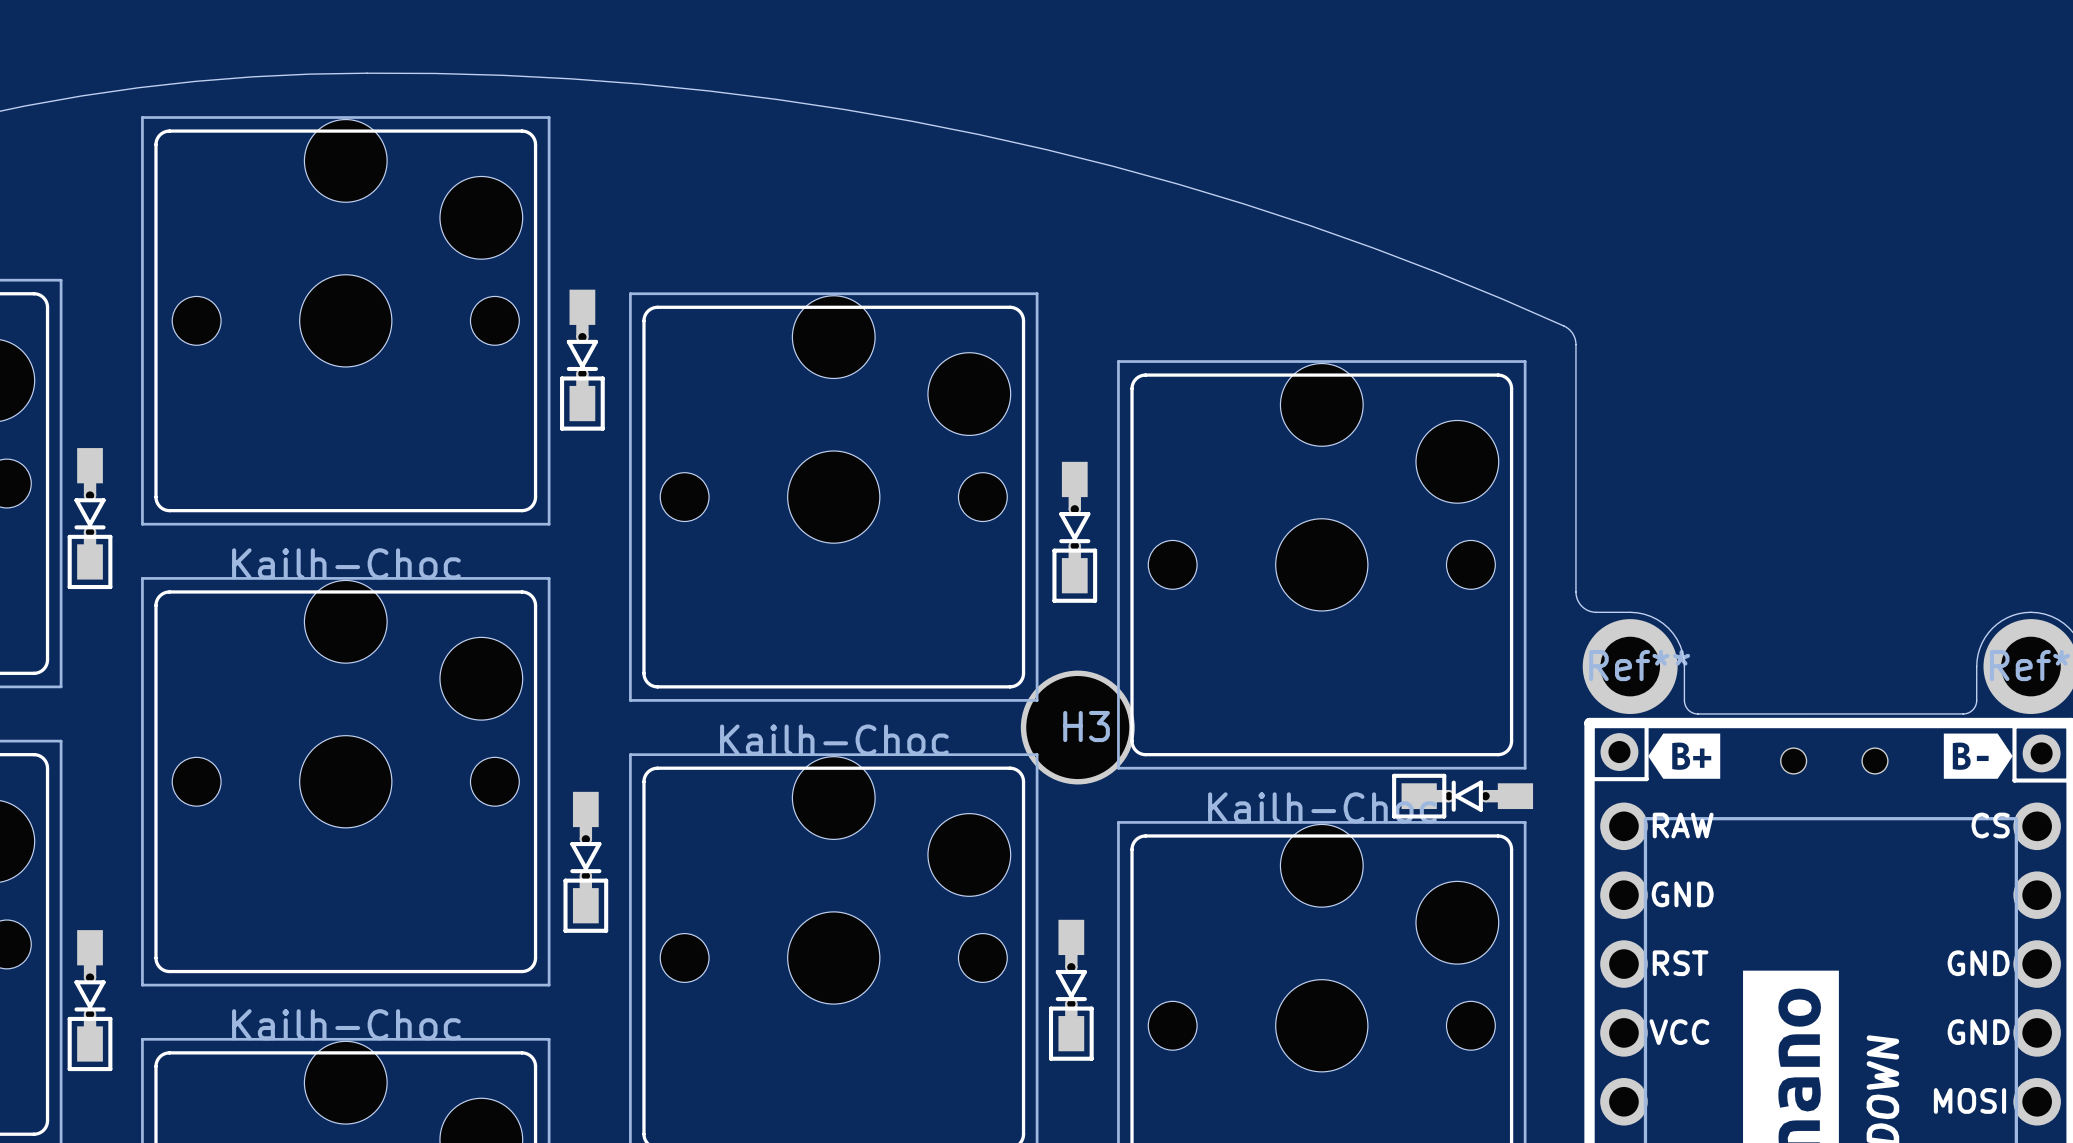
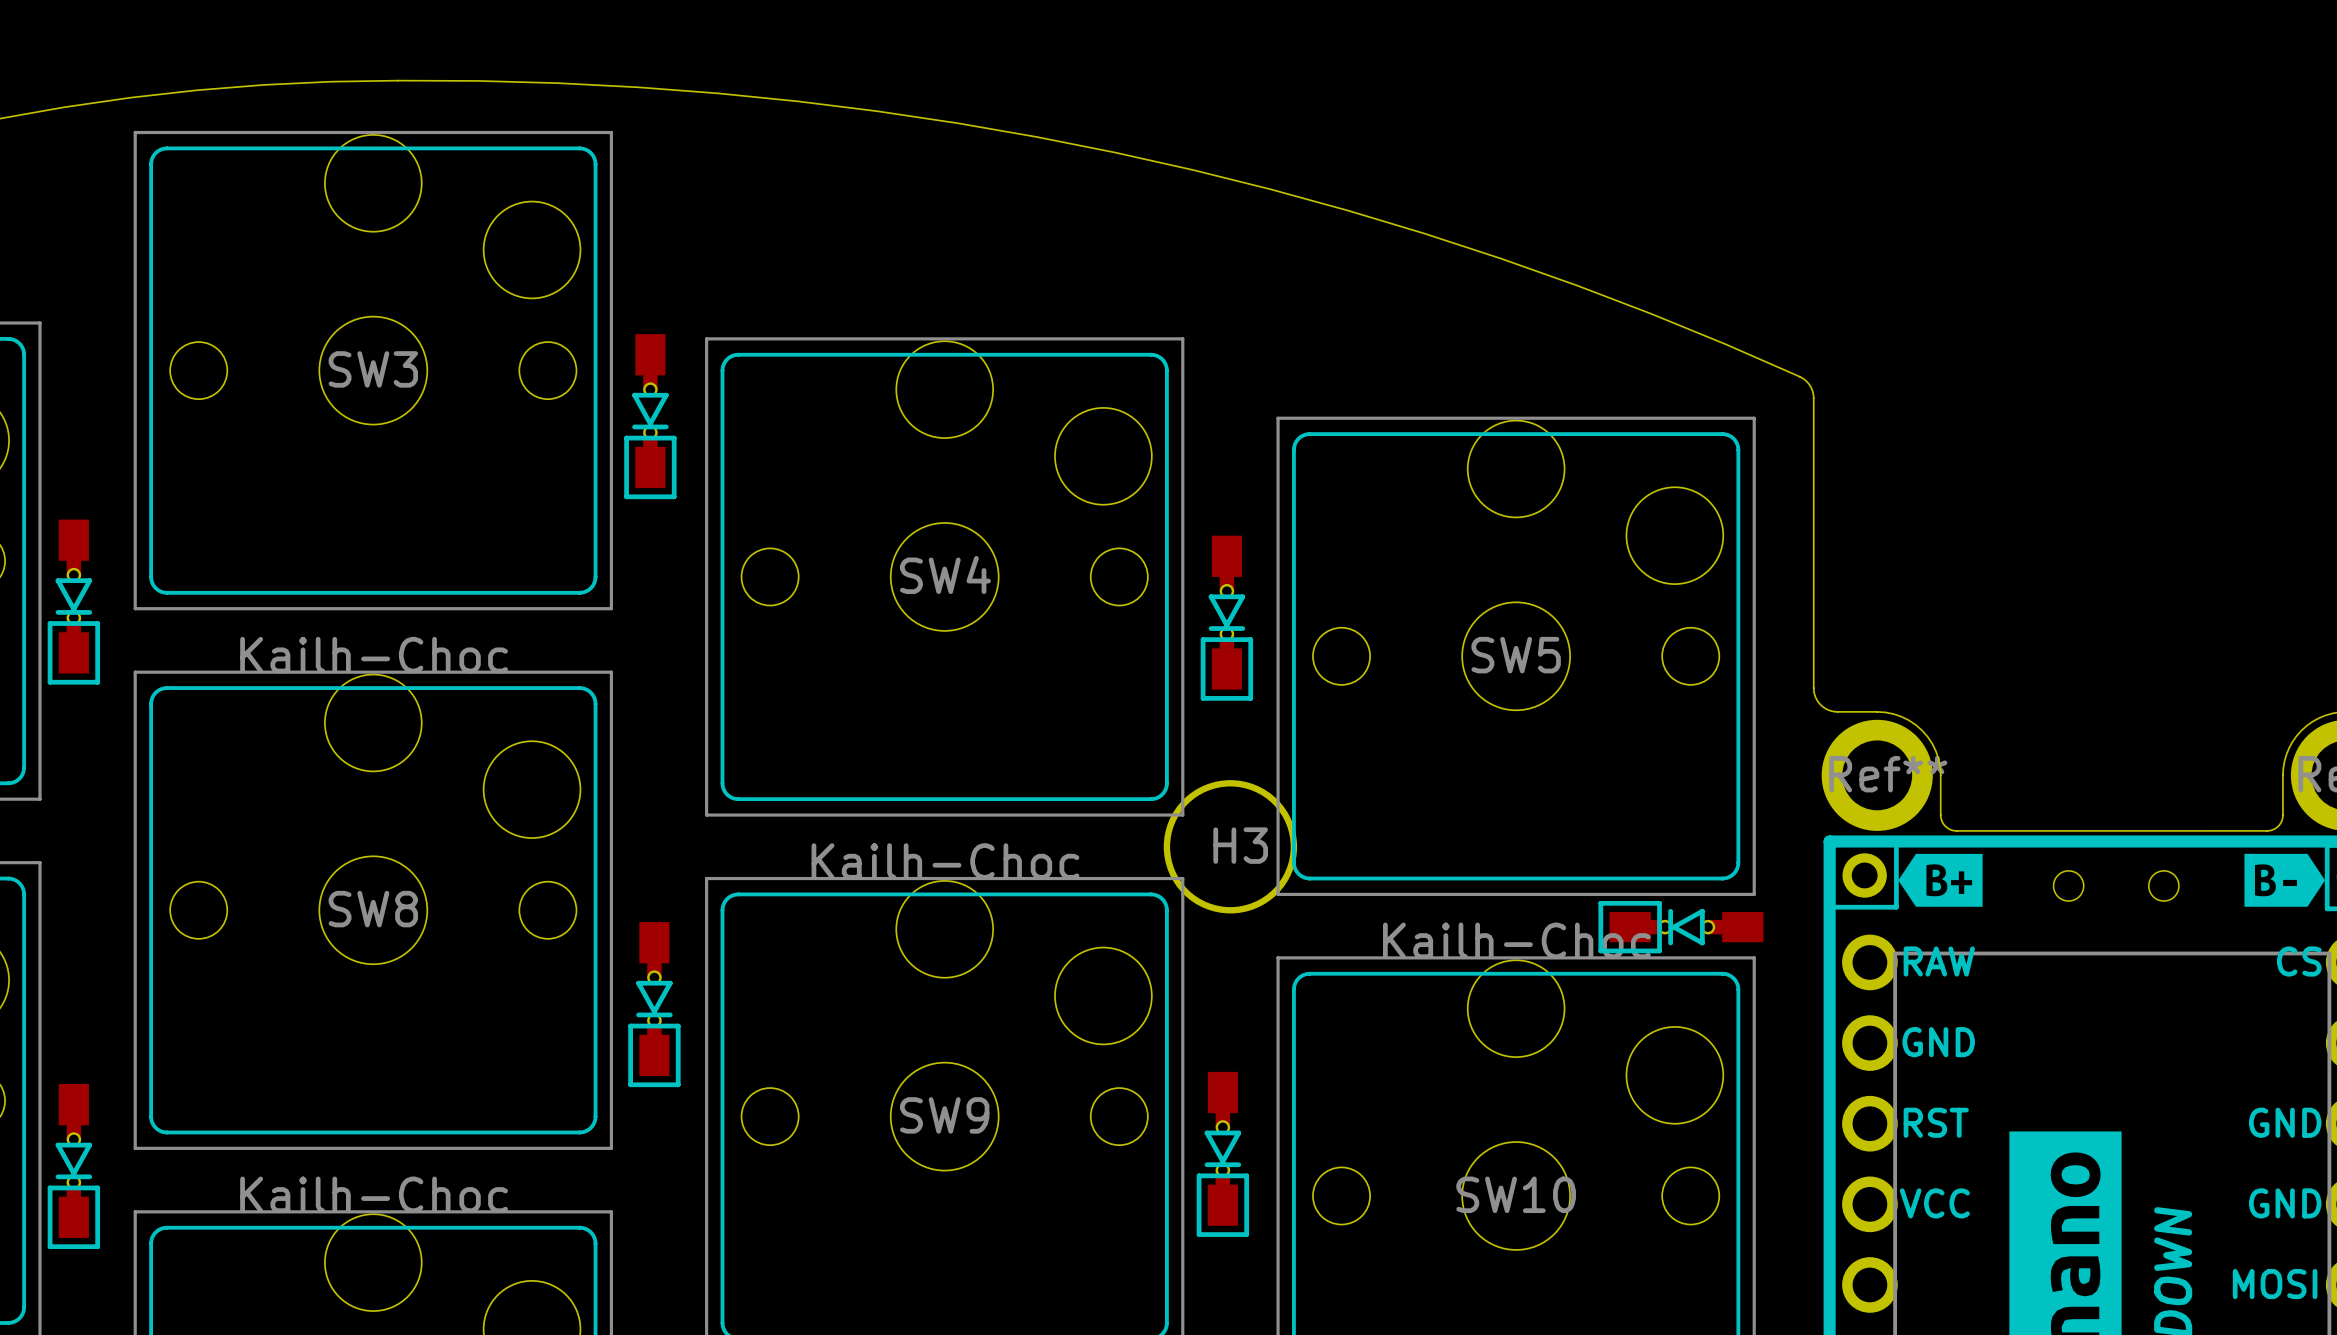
SW3 name: none -> SW3 (373, 369)
SW4 name: none -> SW4 (945, 575)
SW5 name: none -> SW5 (1516, 655)
SW8 name: none -> SW8 (373, 909)
SW9 name: none -> SW9 (944, 1115)
SW10 name: none -> SW10 (1516, 1194)

